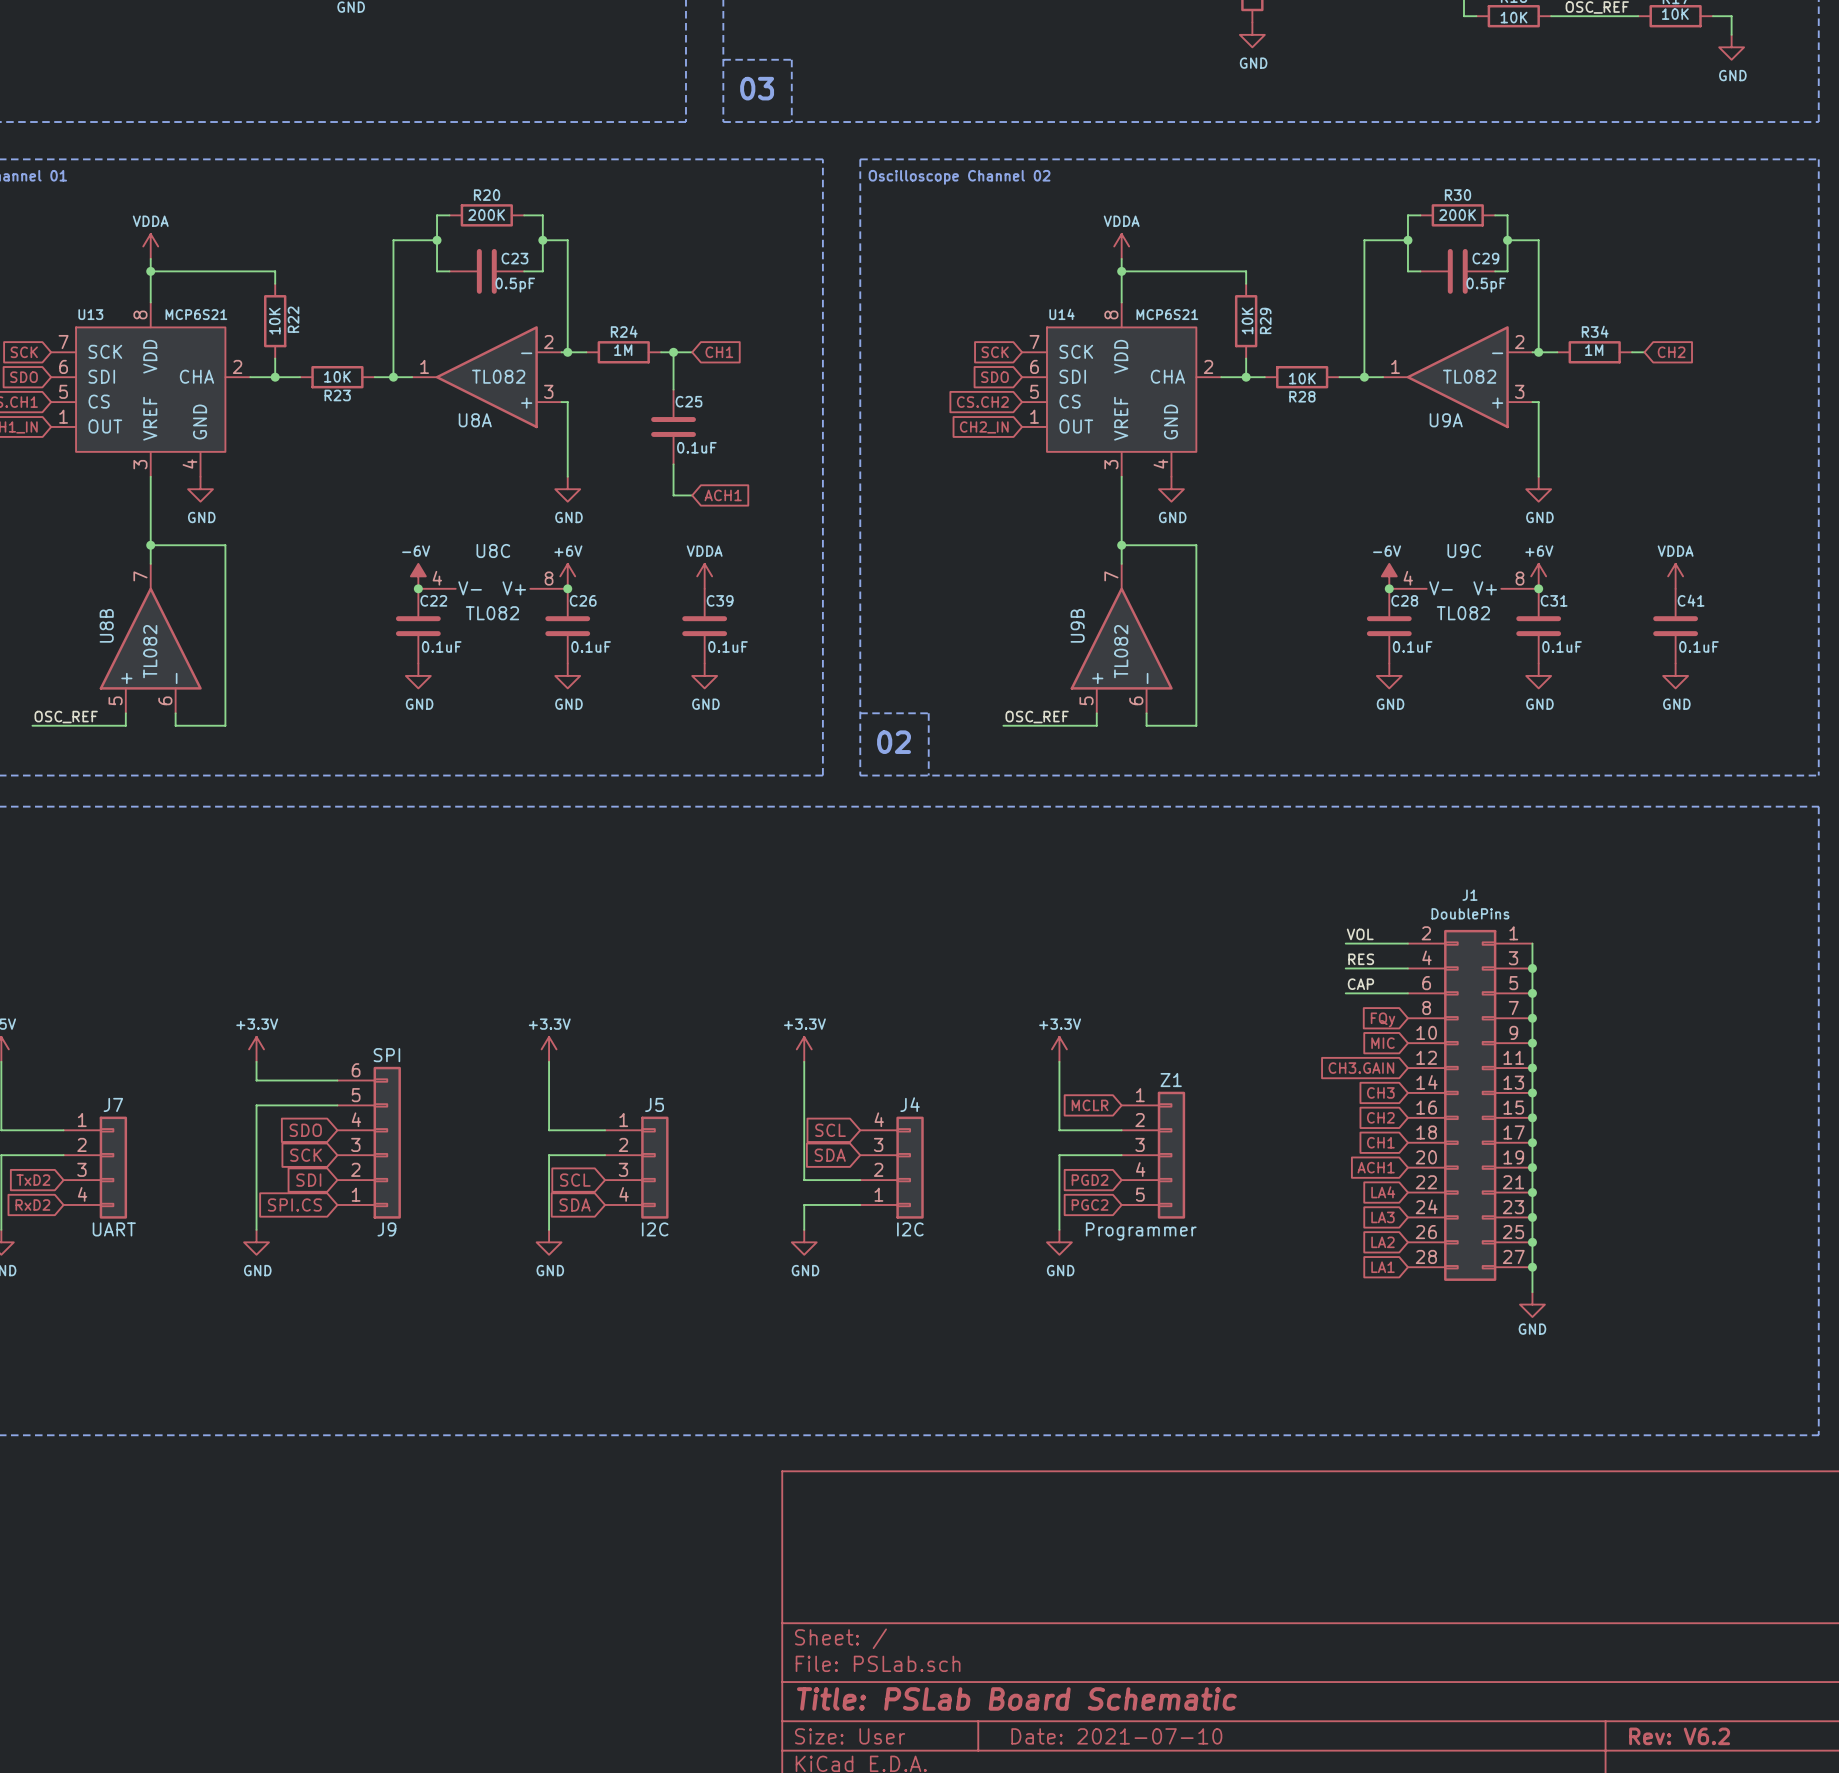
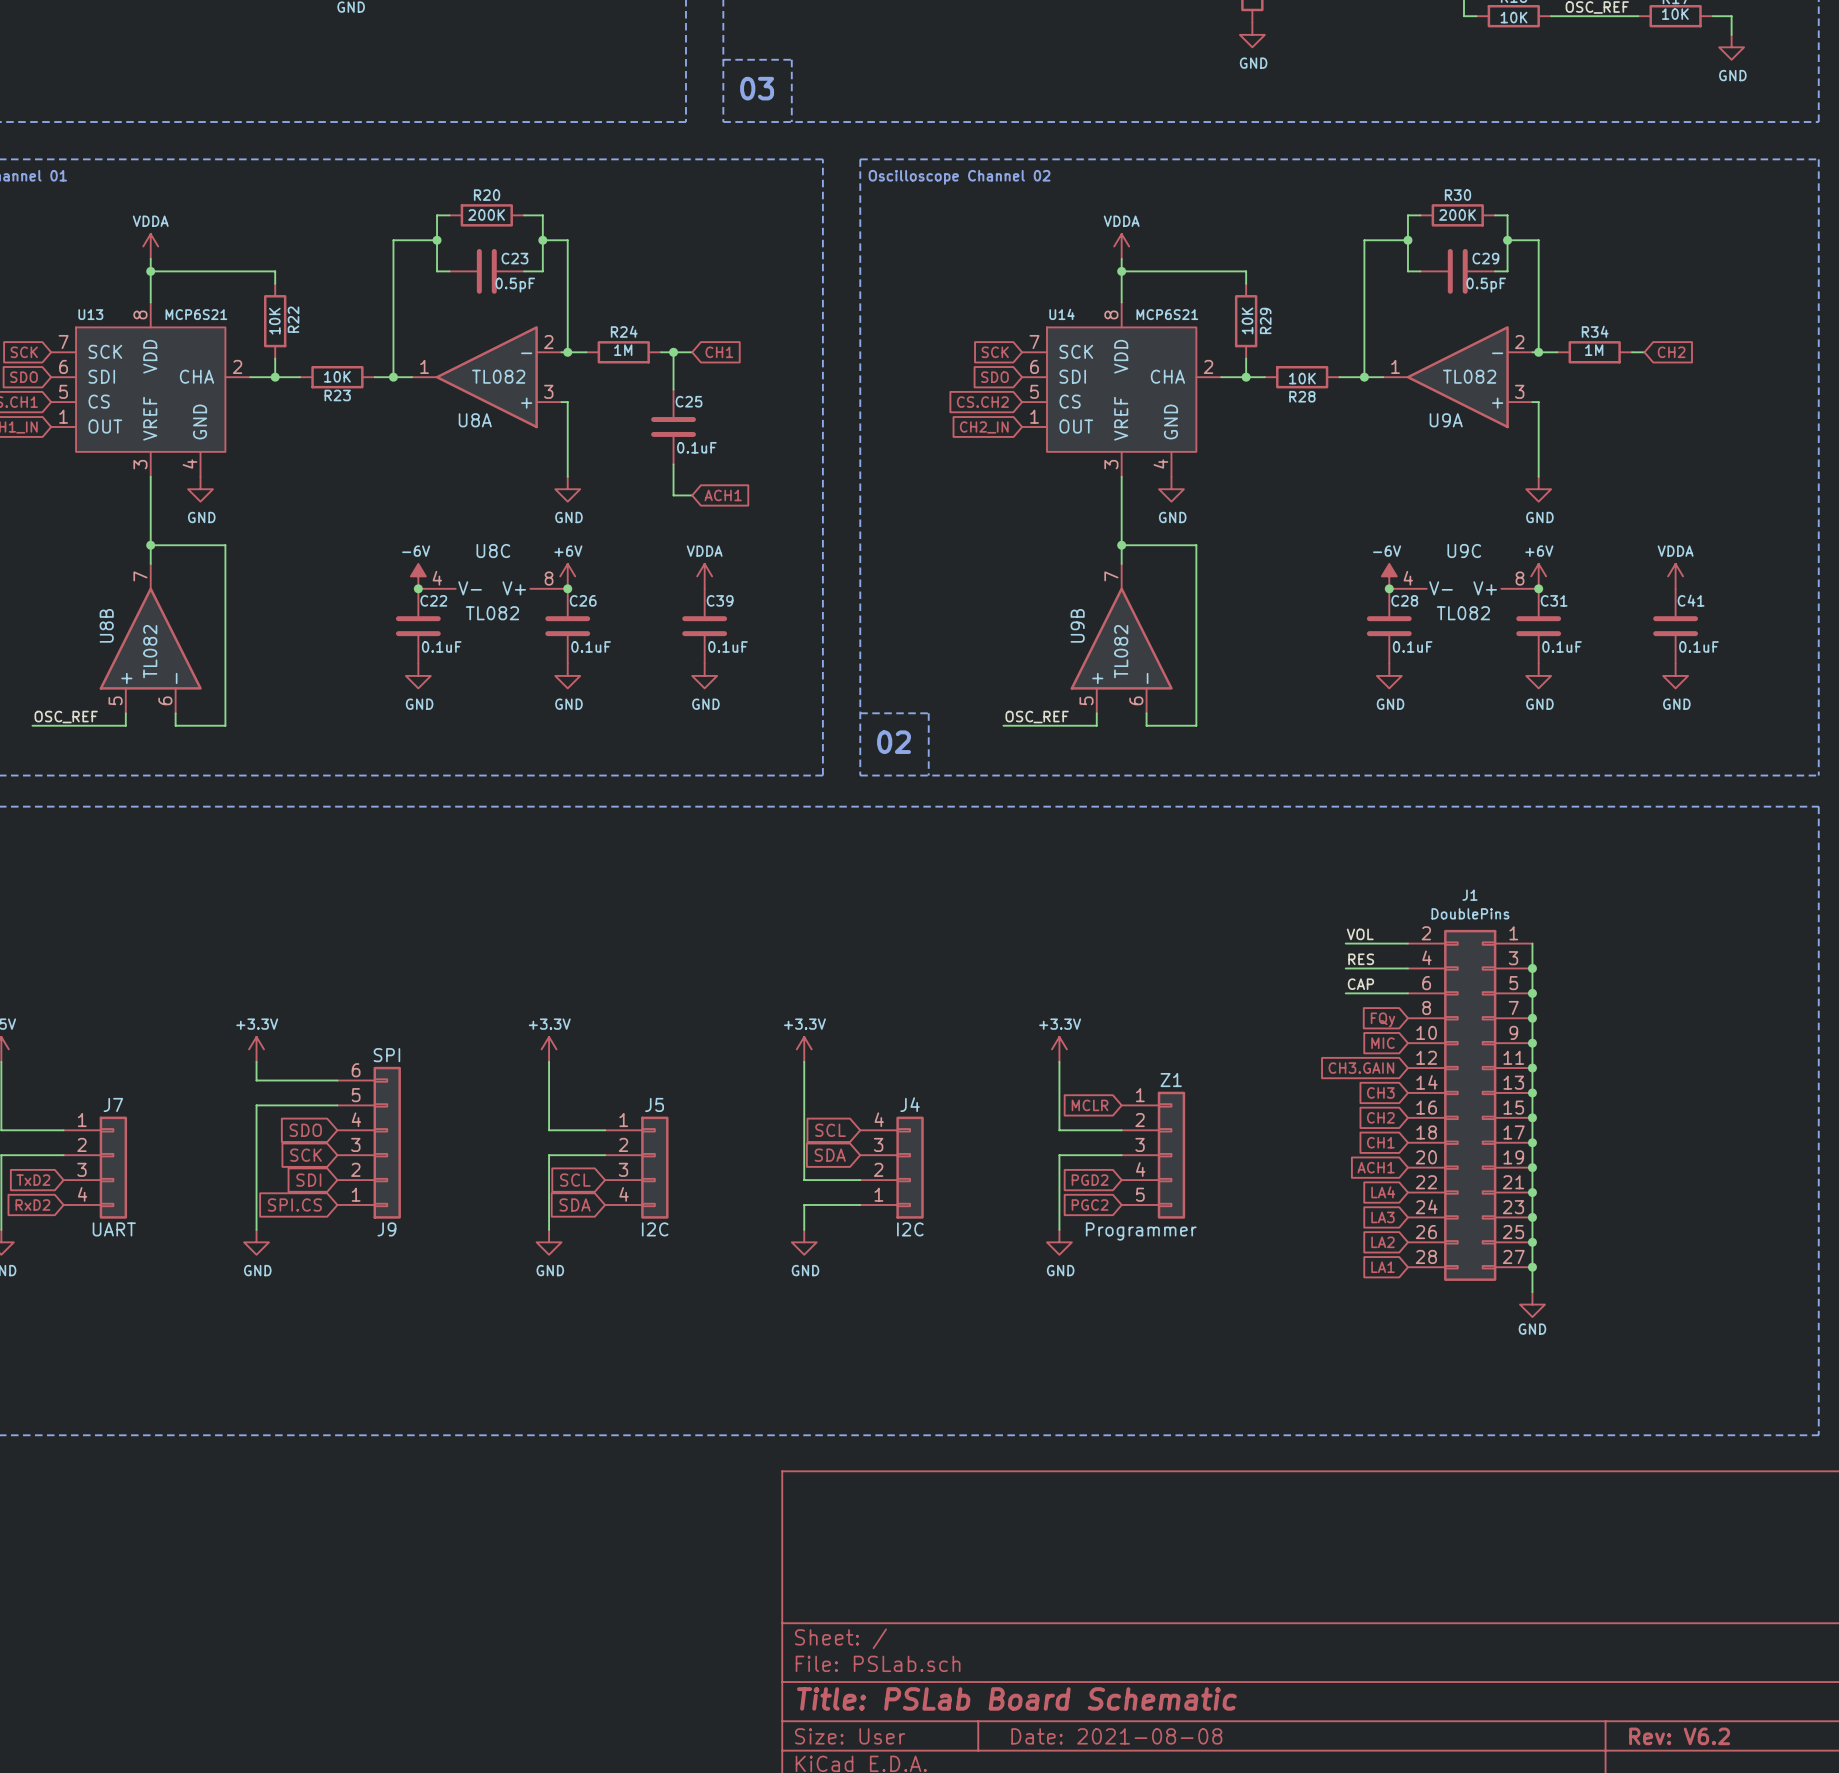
title block: Date: 2021-07-10 (1116, 1736) -> Date: 2021-08-08 (1116, 1736)

